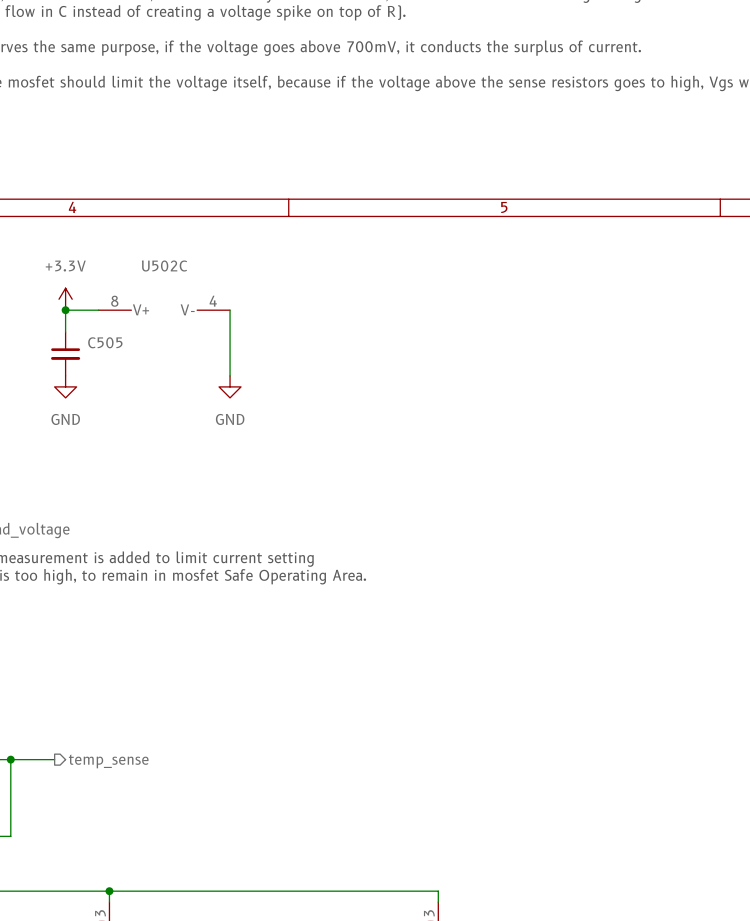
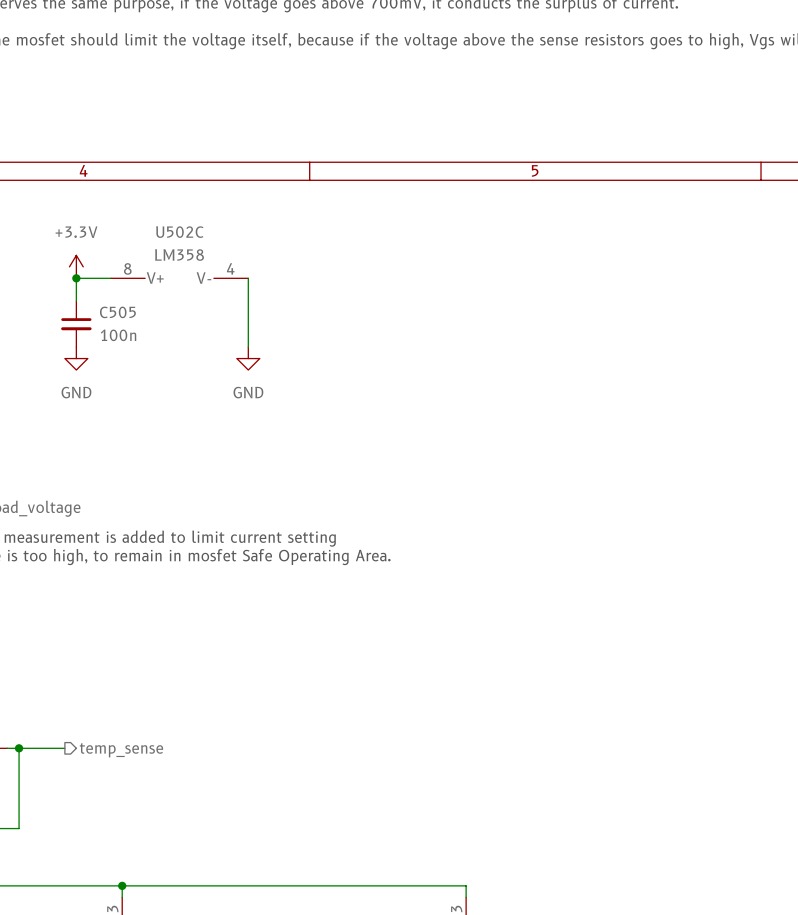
U502C value: none -> LM358 (179, 255)
C505 value: none -> 100n (118, 335)

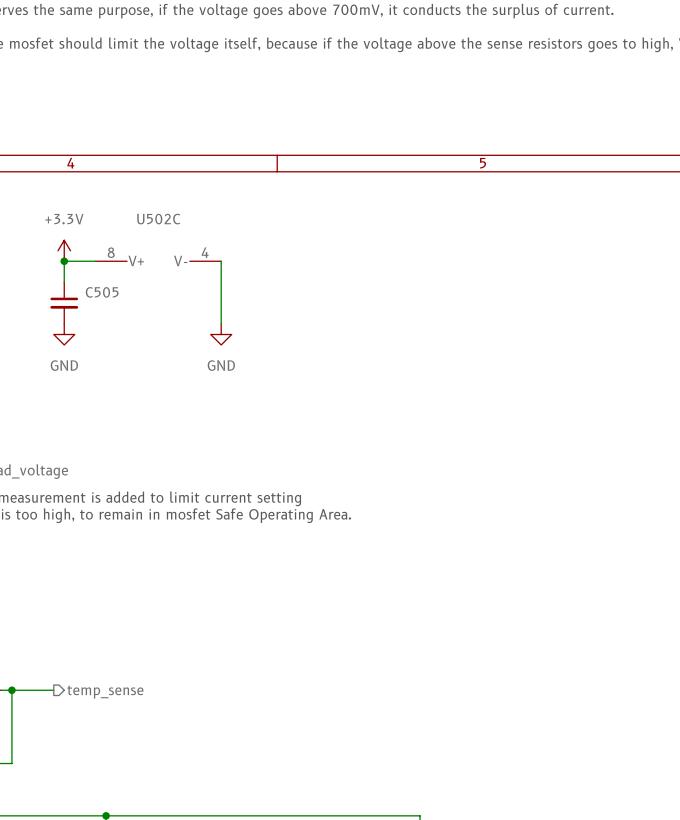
U502C value: LM358 (179, 255) -> none
C505 value: 100n (118, 335) -> none

